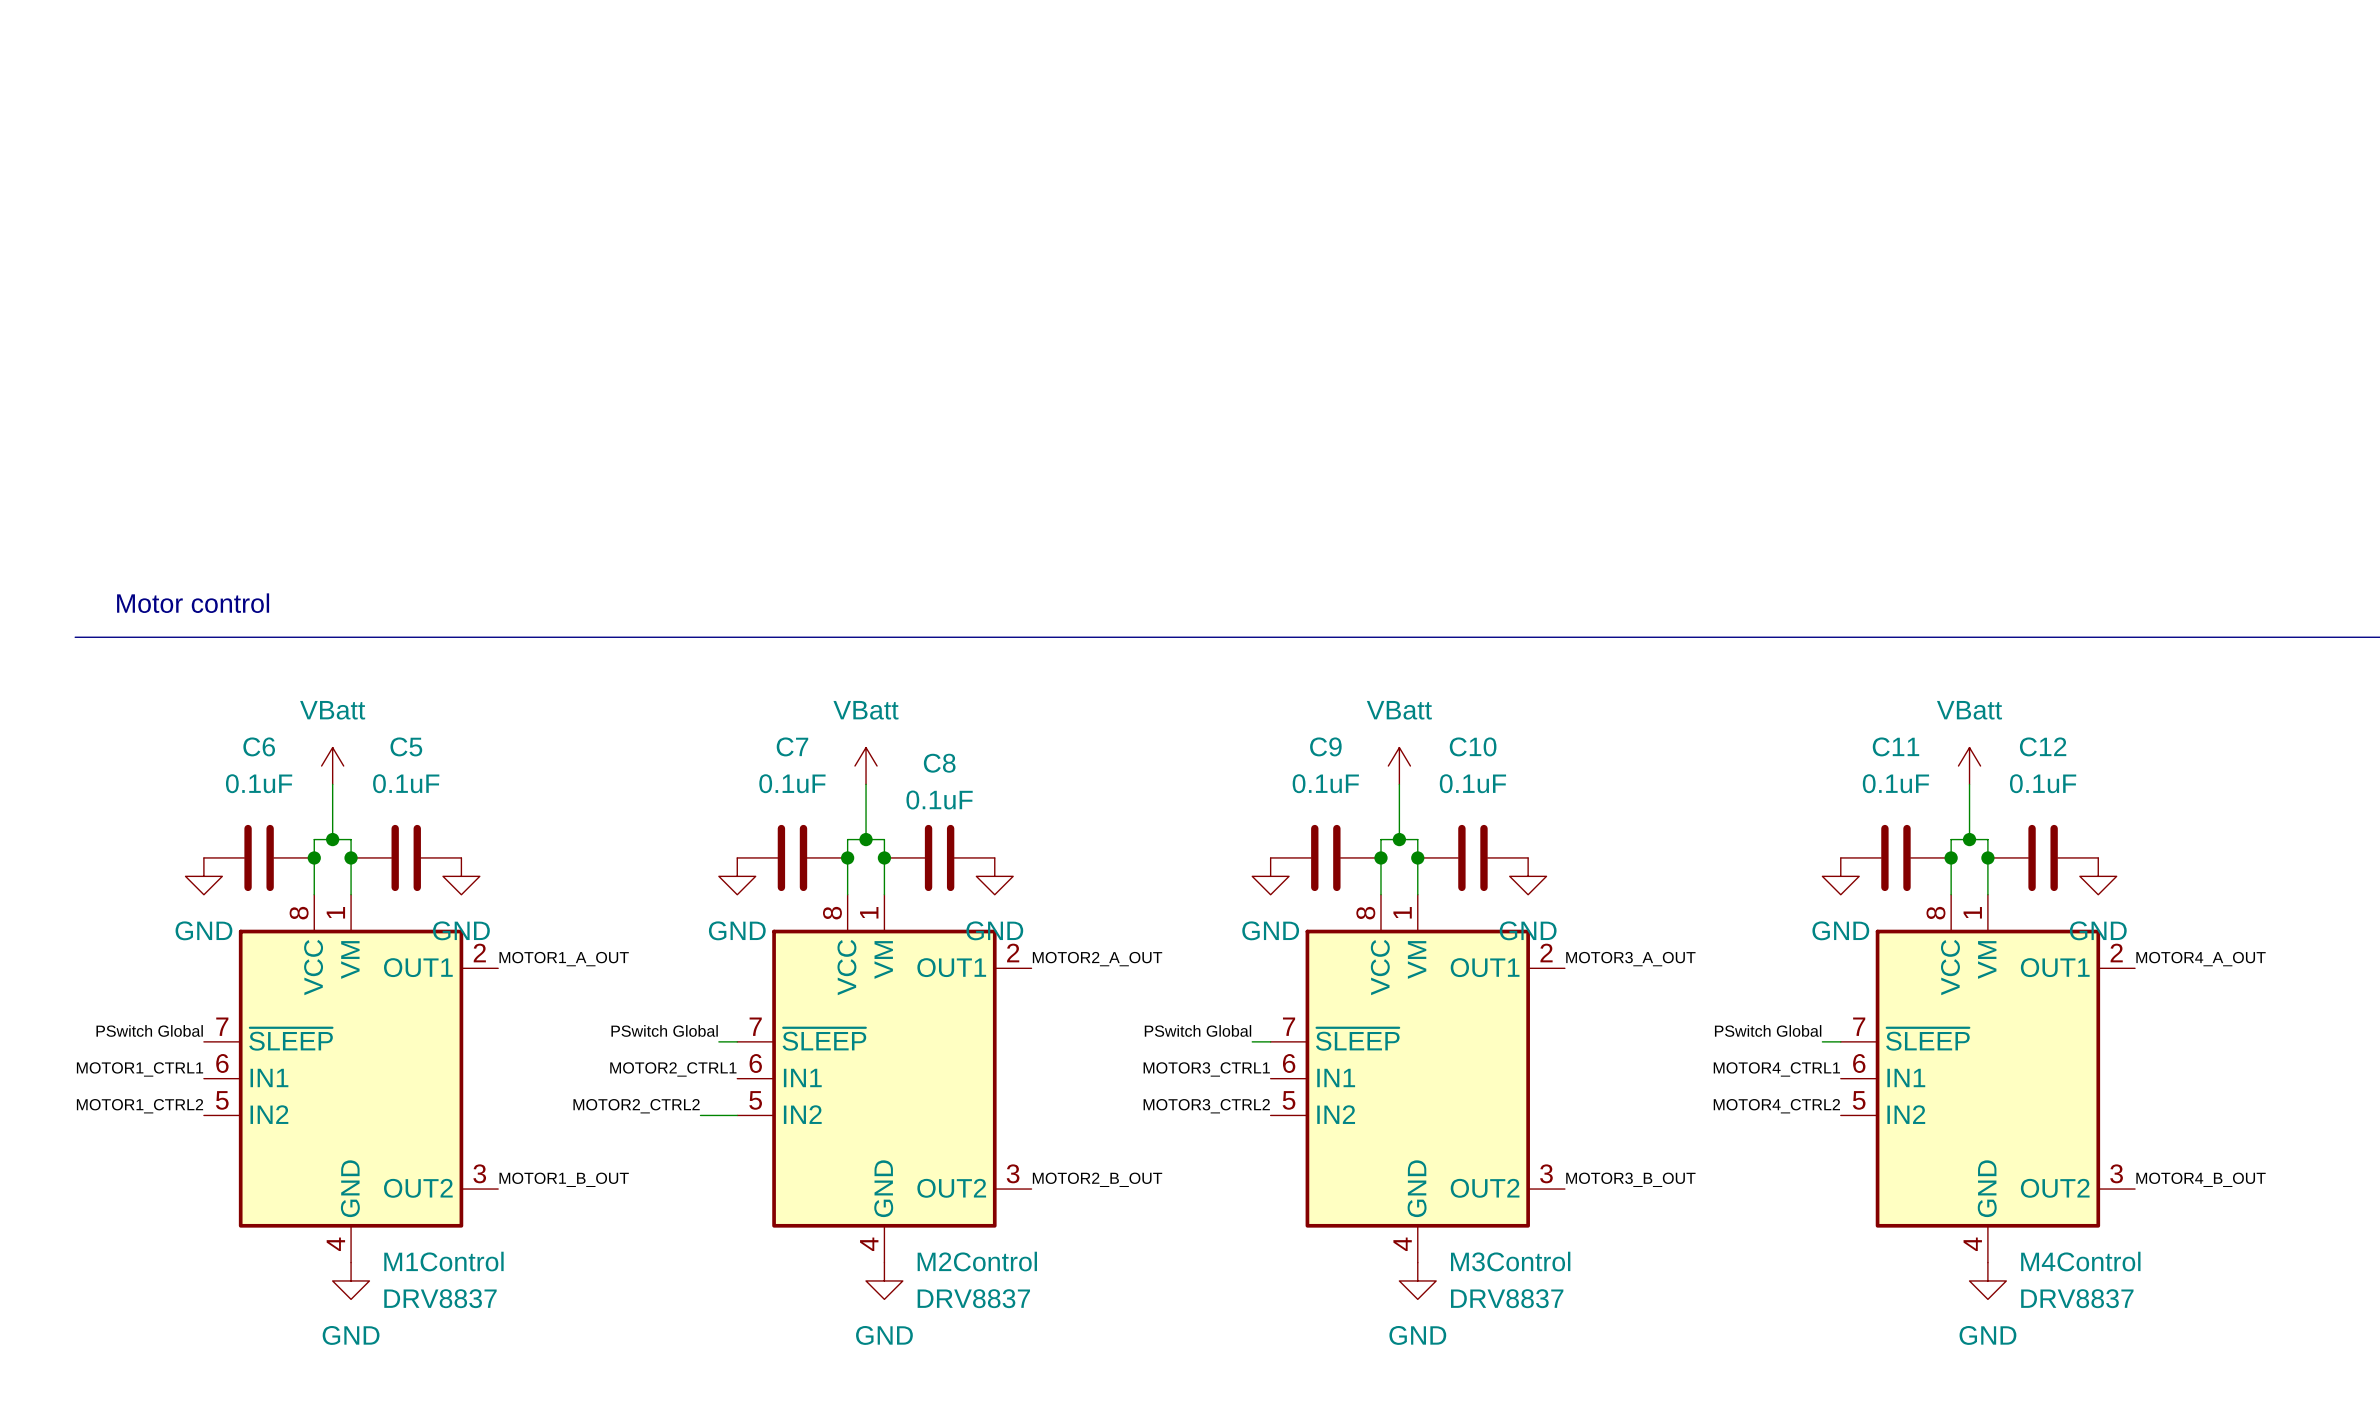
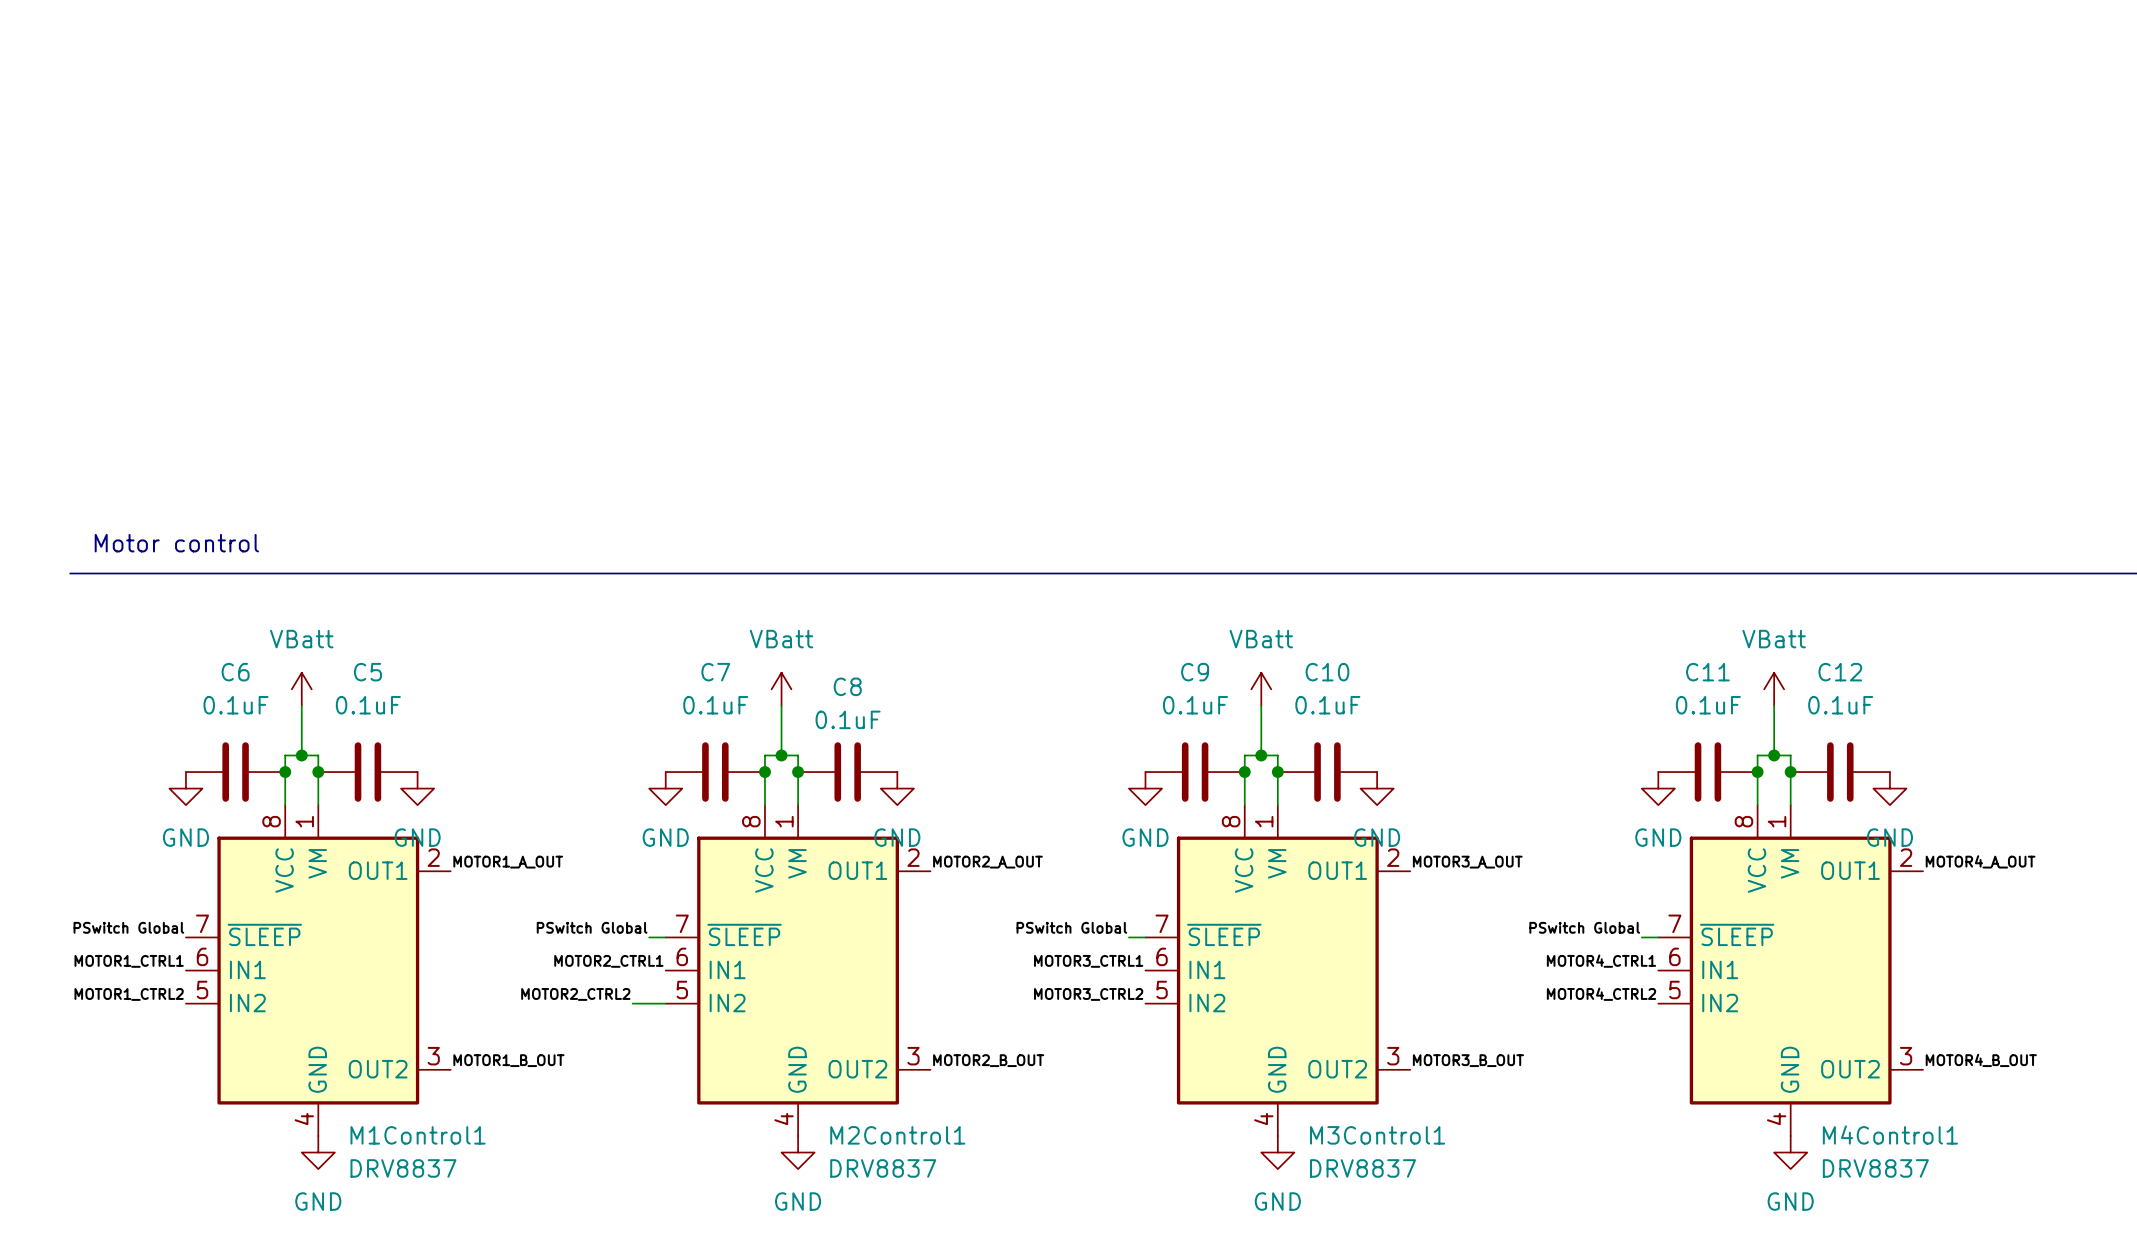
M1Control name: M1Control (443, 1261) -> M1Control1 (418, 1135)
M2Control name: M2Control (977, 1261) -> M2Control1 (897, 1135)
M3Control name: M3Control (1510, 1261) -> M3Control1 (1377, 1135)
M4Control name: M4Control (2080, 1261) -> M4Control1 (1890, 1134)

